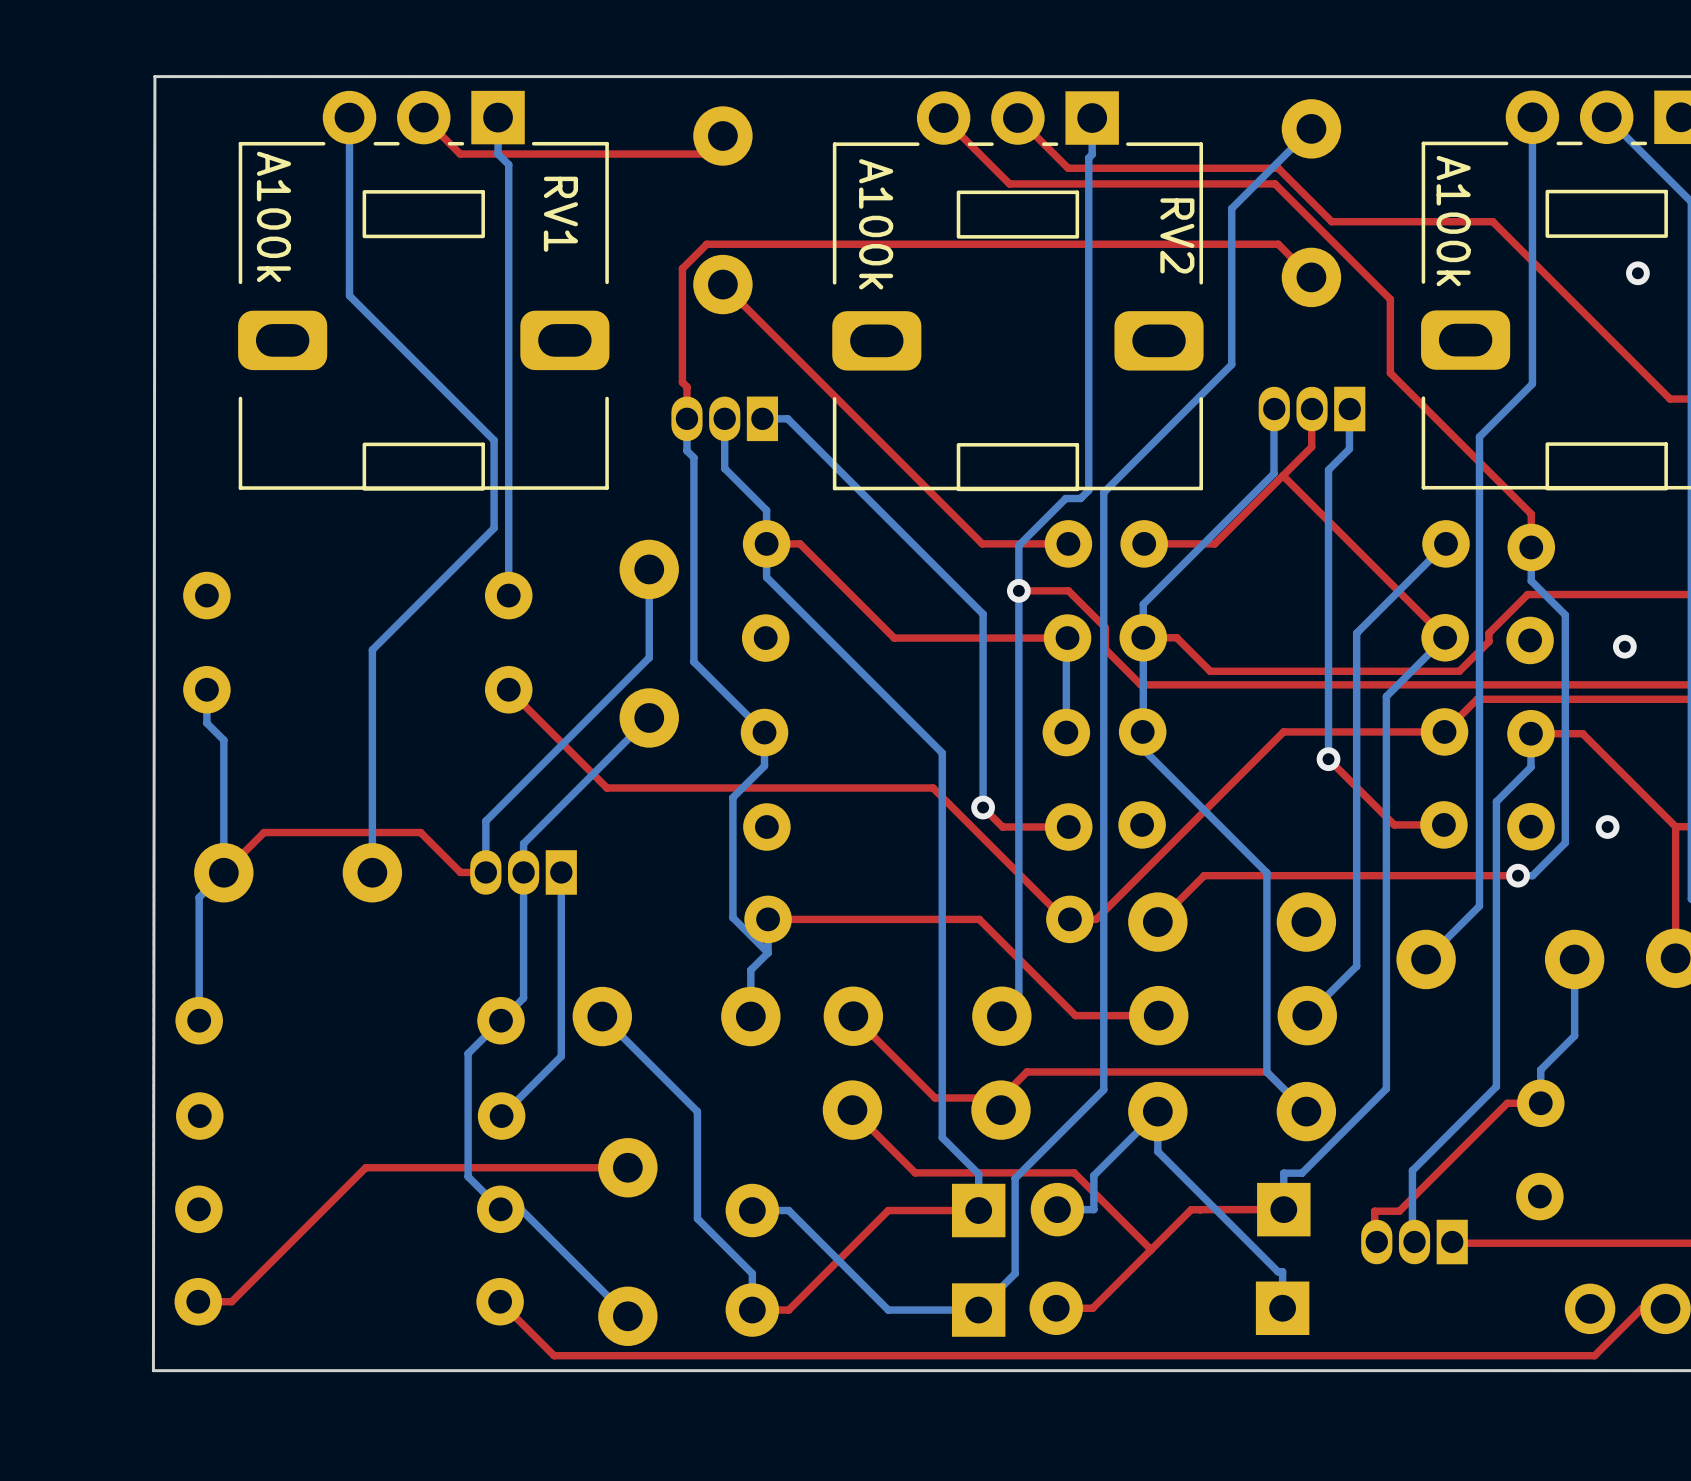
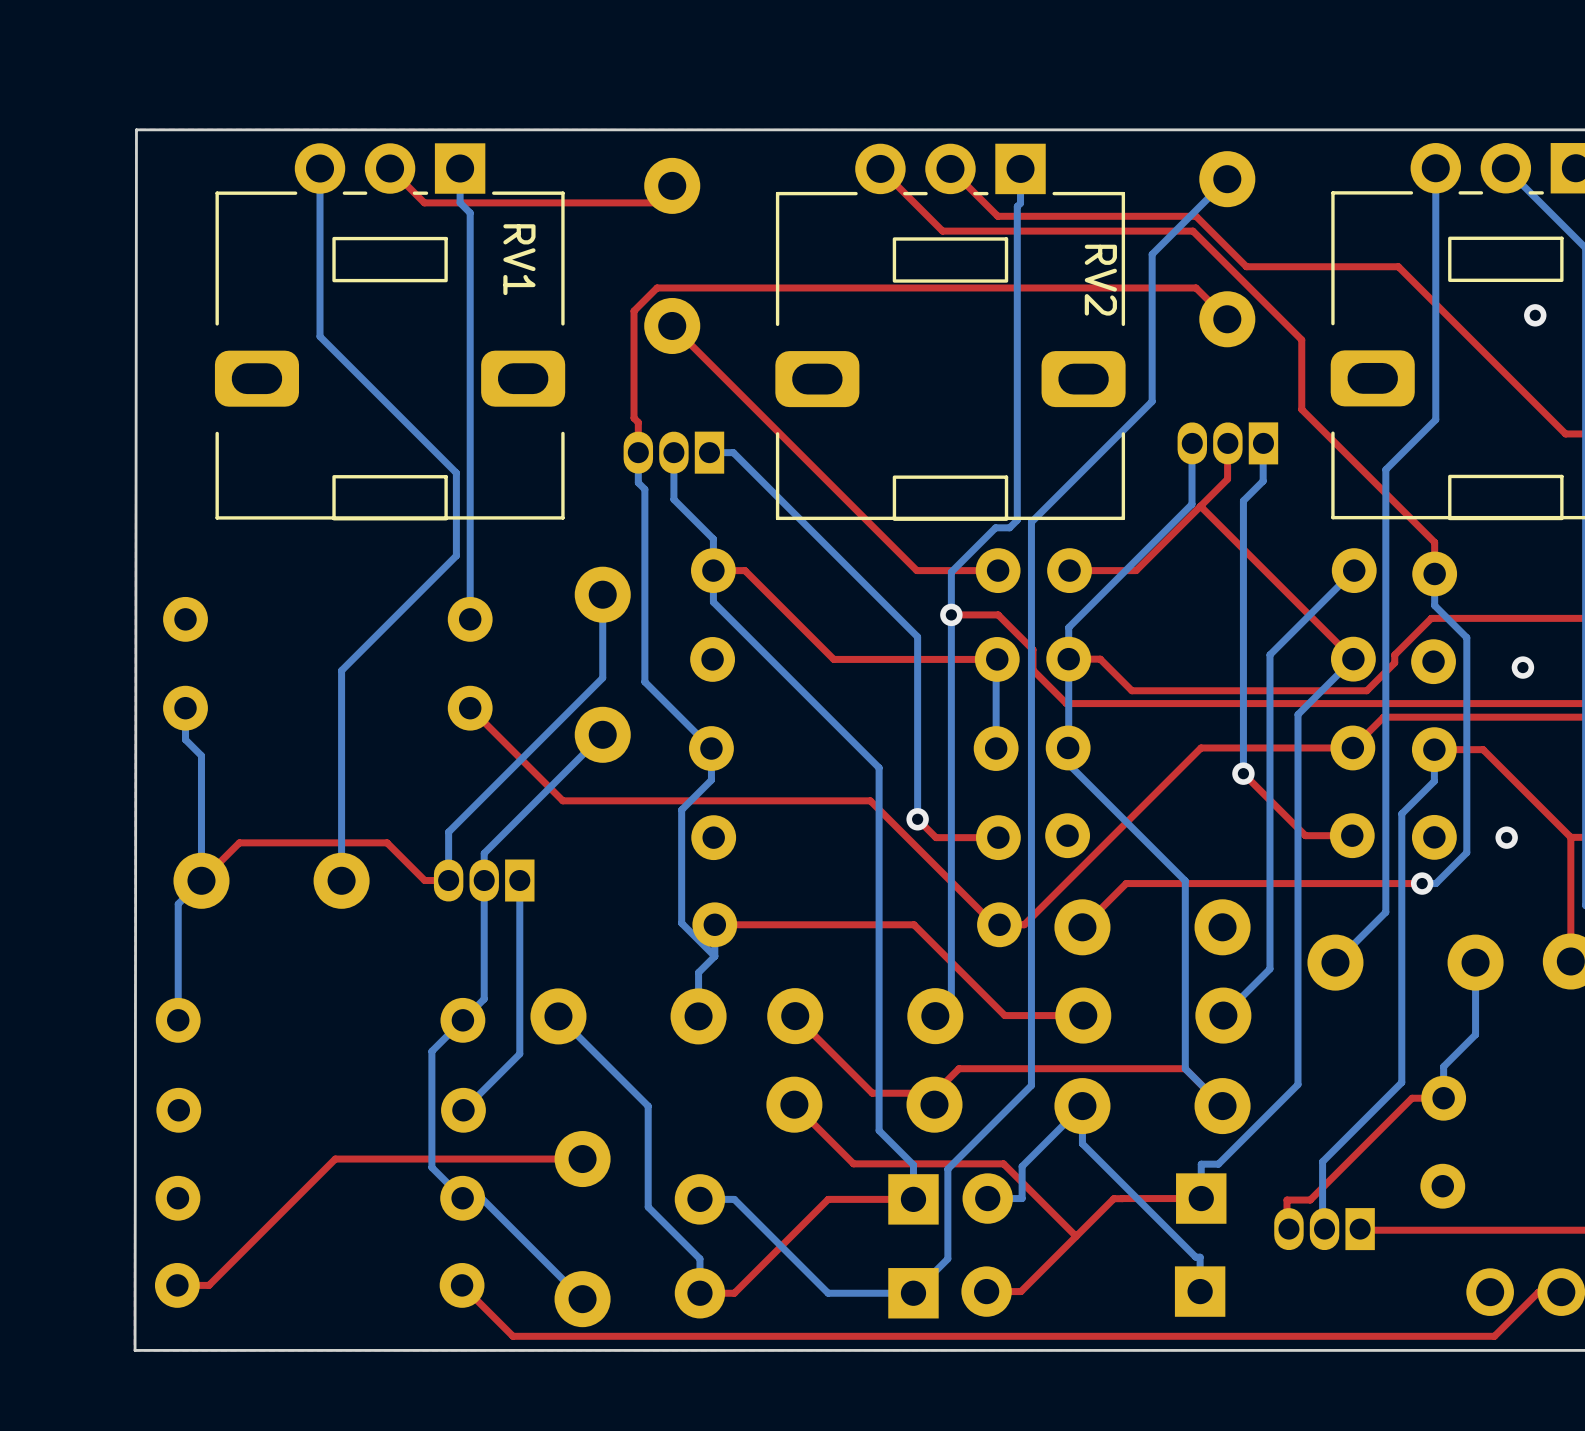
RV1 value: A100k (273, 216) -> none
part value: A100k (1453, 221) -> none
RV2 value: A100k (876, 224) -> none

